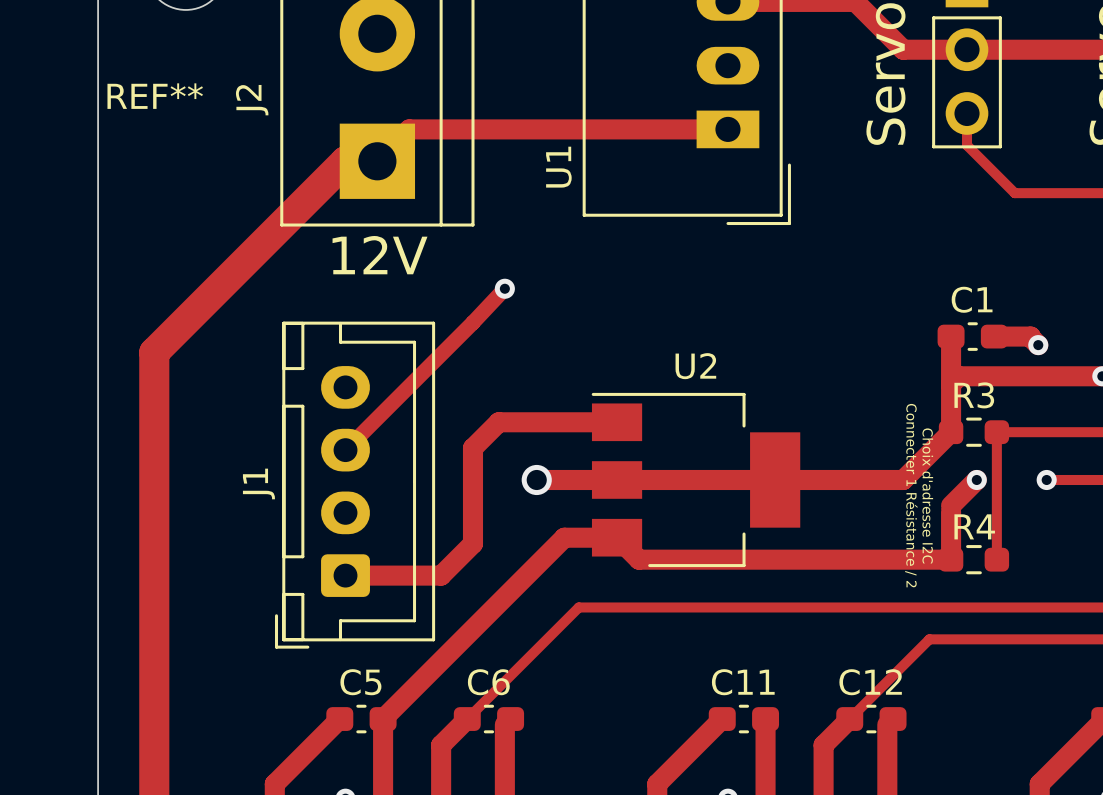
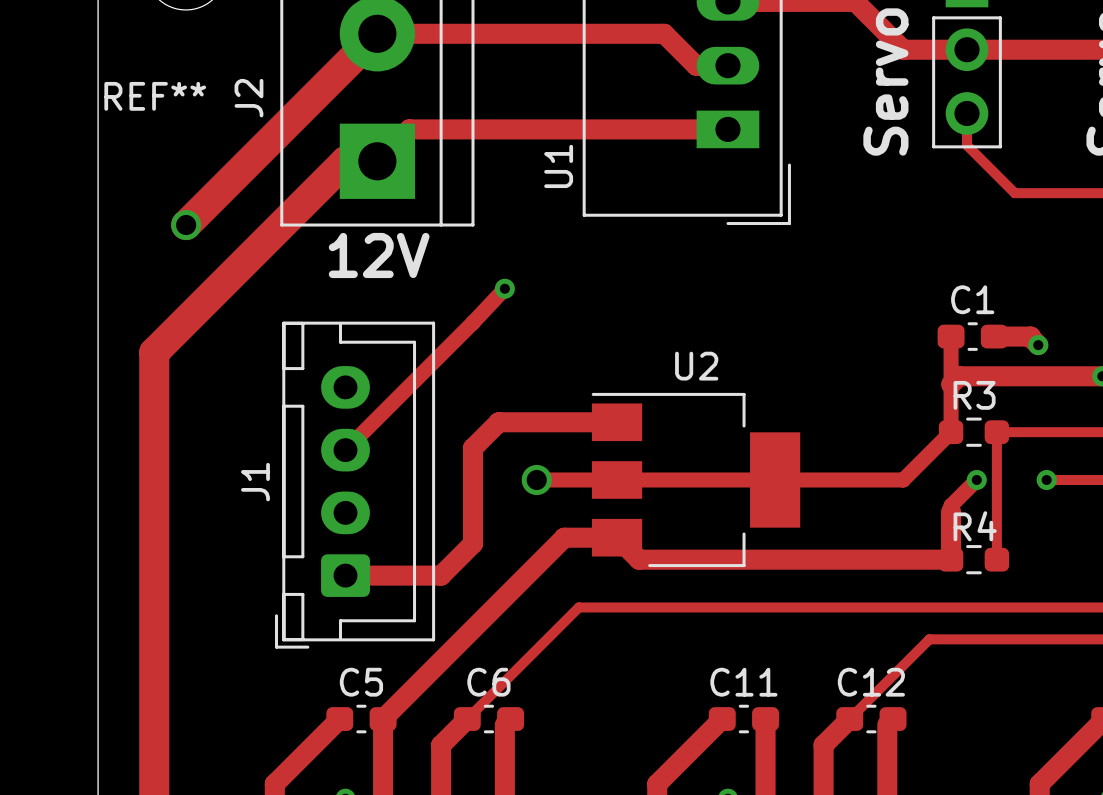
track: none -> (727, 65) (696, 65) (664, 33) (377, 33) (186, 225)
via: none -> (186, 225)
track width: thick (951, 336) (951, 432) (903, 479) (536, 479) -> thin (951, 336) (951, 432) (903, 479) (536, 479)
track width: thick (976, 479) (951, 505) -> thin (976, 479) (951, 505)
text: Connecter 1 Résistance / 2 (911, 495) -> none
text: Choix d'adresse I2C (927, 495) -> none

